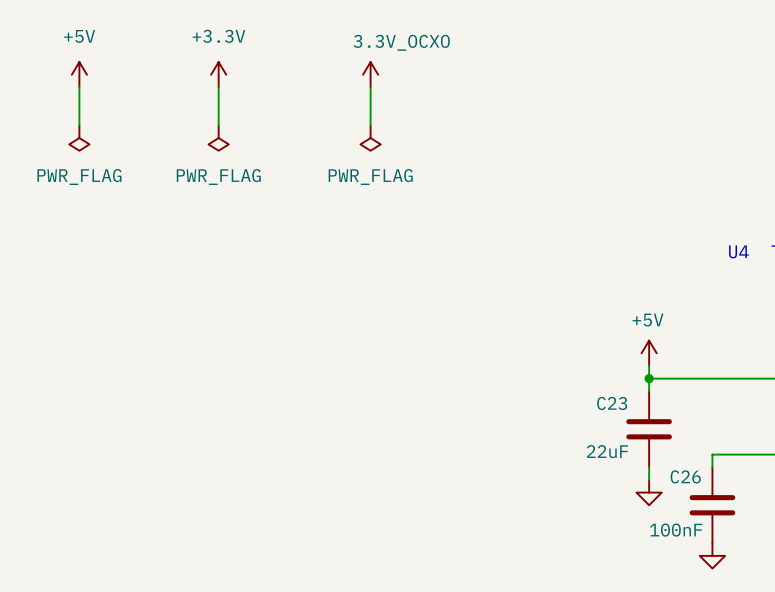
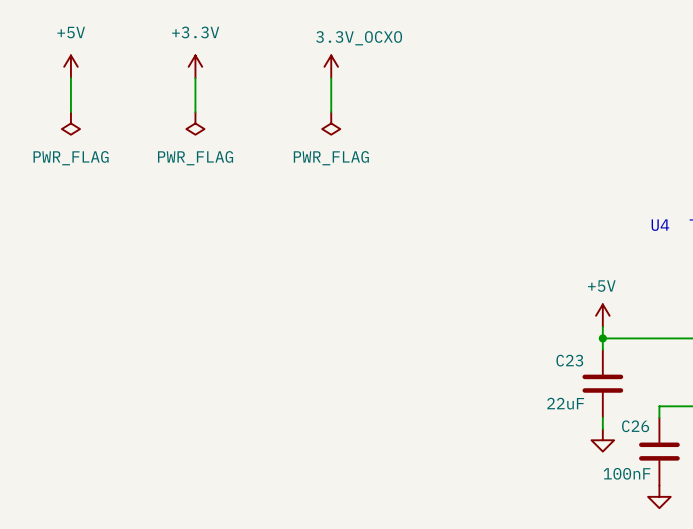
power symbol position: +5V (649, 353) -> +5V (602, 315)
wire: (649, 365) (649, 391) -> (602, 327) (602, 349)
wire: (649, 378) (674, 378) -> none
junction position: (649, 378) -> (602, 338)
C23 position: (649, 429) -> (602, 383)
wire: (737, 454) (712, 454) (712, 467) -> (659, 406) (659, 417)
wire: (649, 467) (649, 479) -> (602, 417) (602, 428)
power symbol position: (649, 492) -> (602, 440)
C26 position: (712, 505) -> (659, 451)
power symbol position: (712, 555) -> (659, 496)

